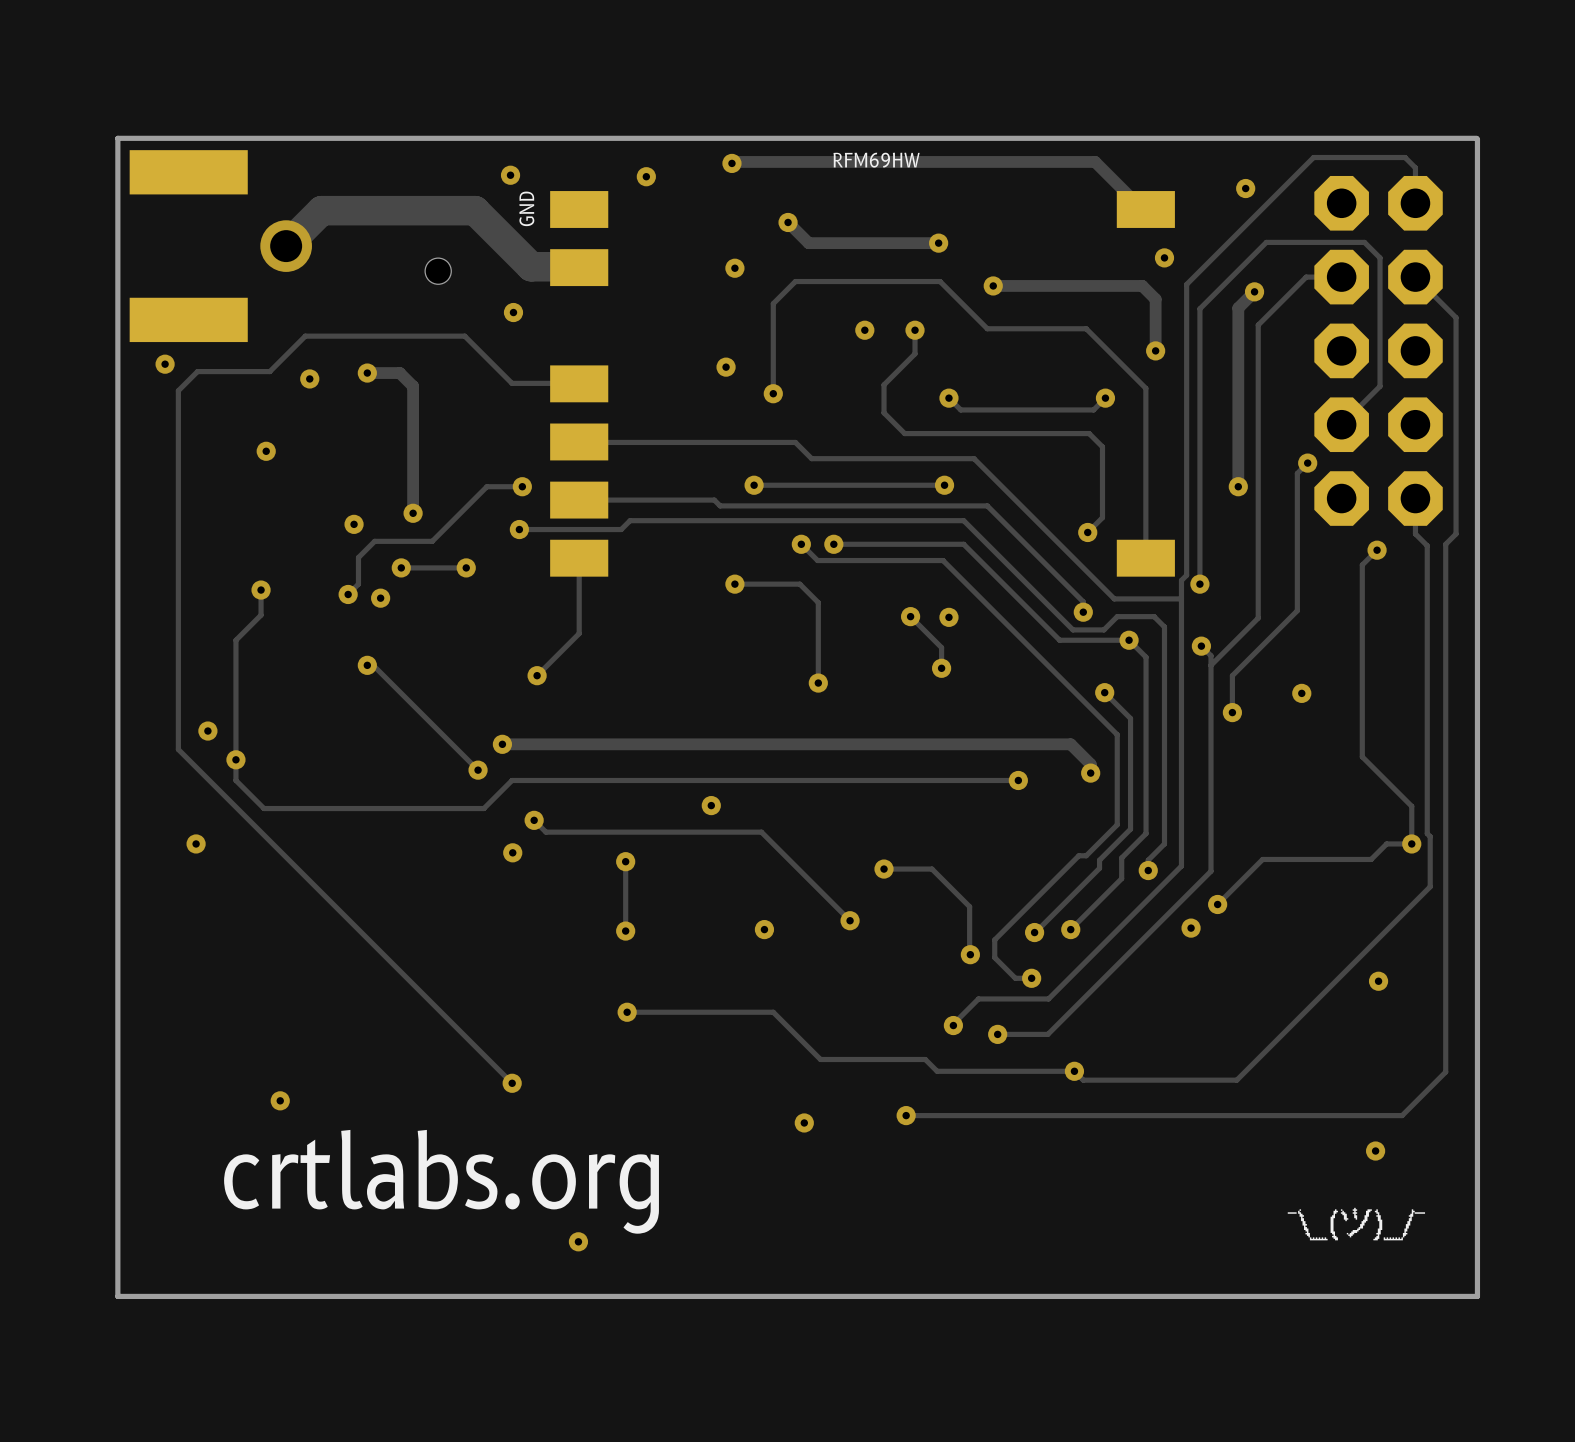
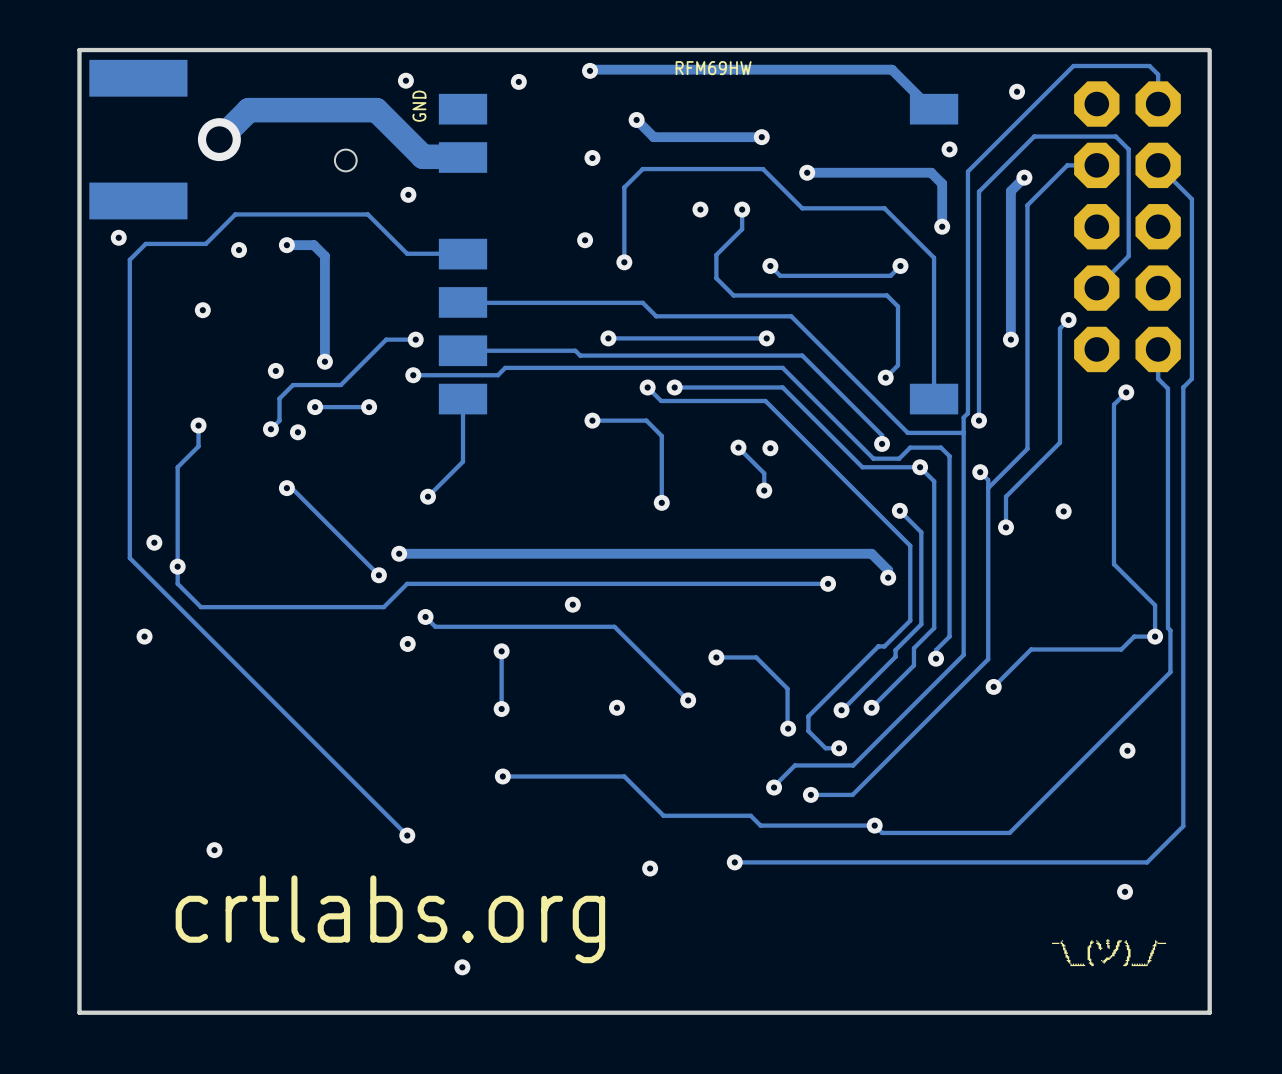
via: (1191, 928) -> none

